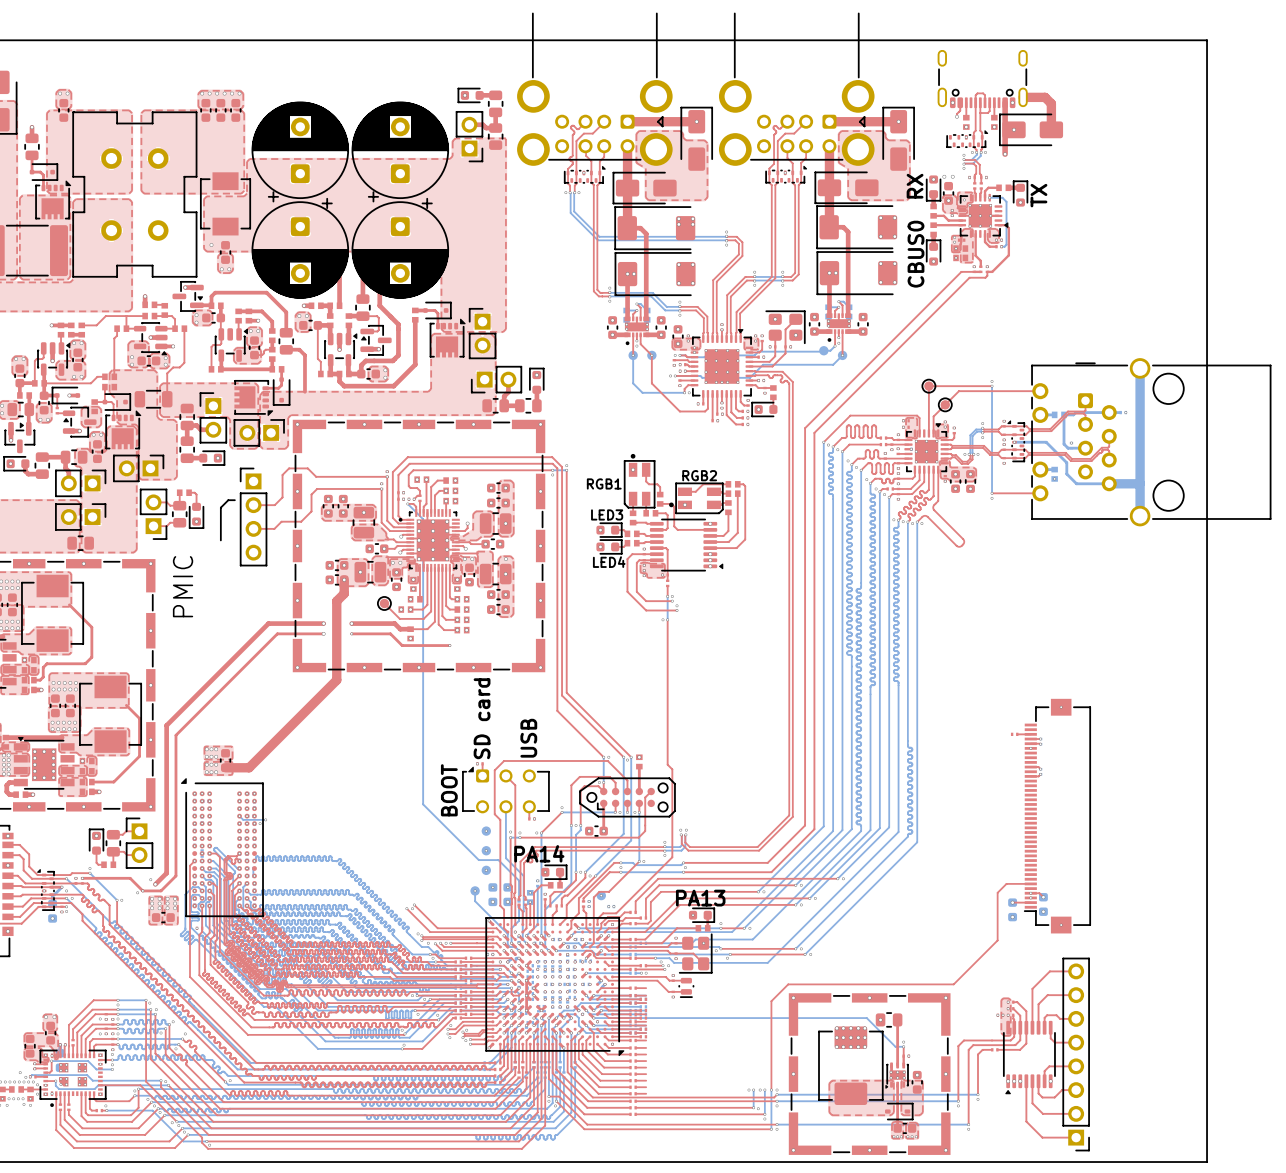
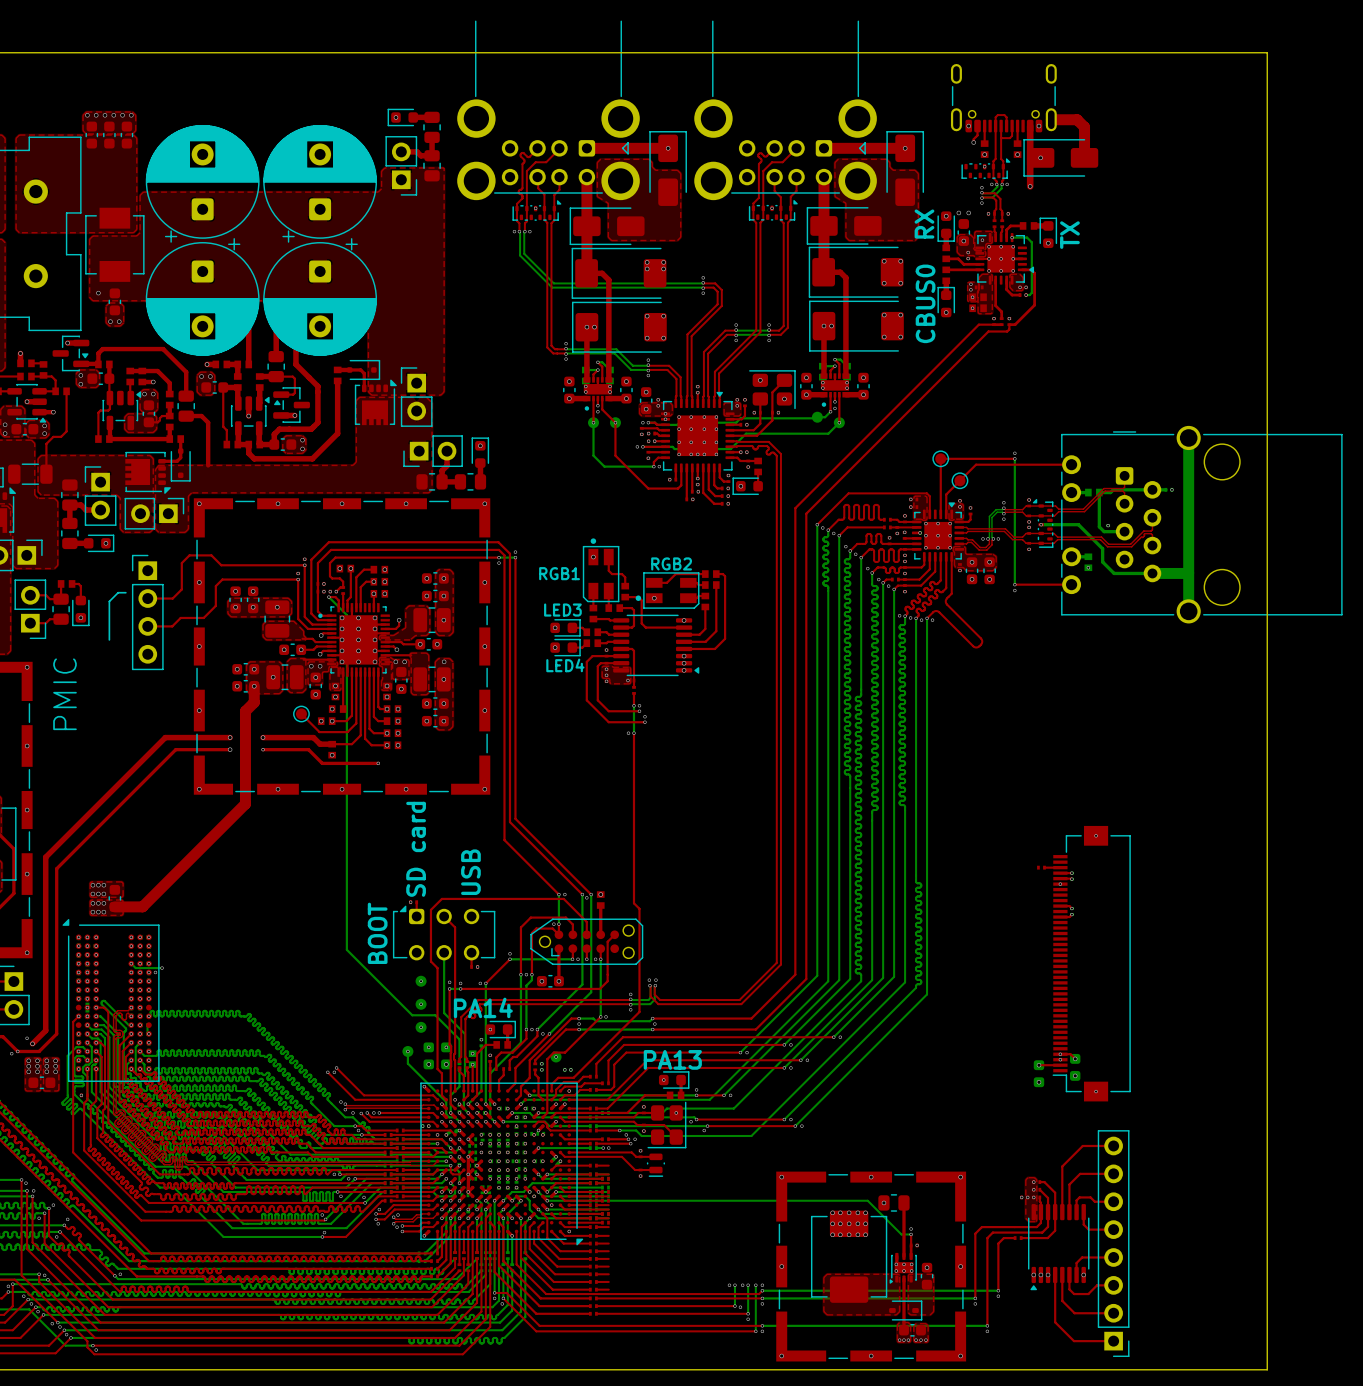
top track: (1030, 883) (1006, 883) (997, 892) (997, 940) (953, 984) (788, 984) (771, 1001) (771, 1090) -> none

